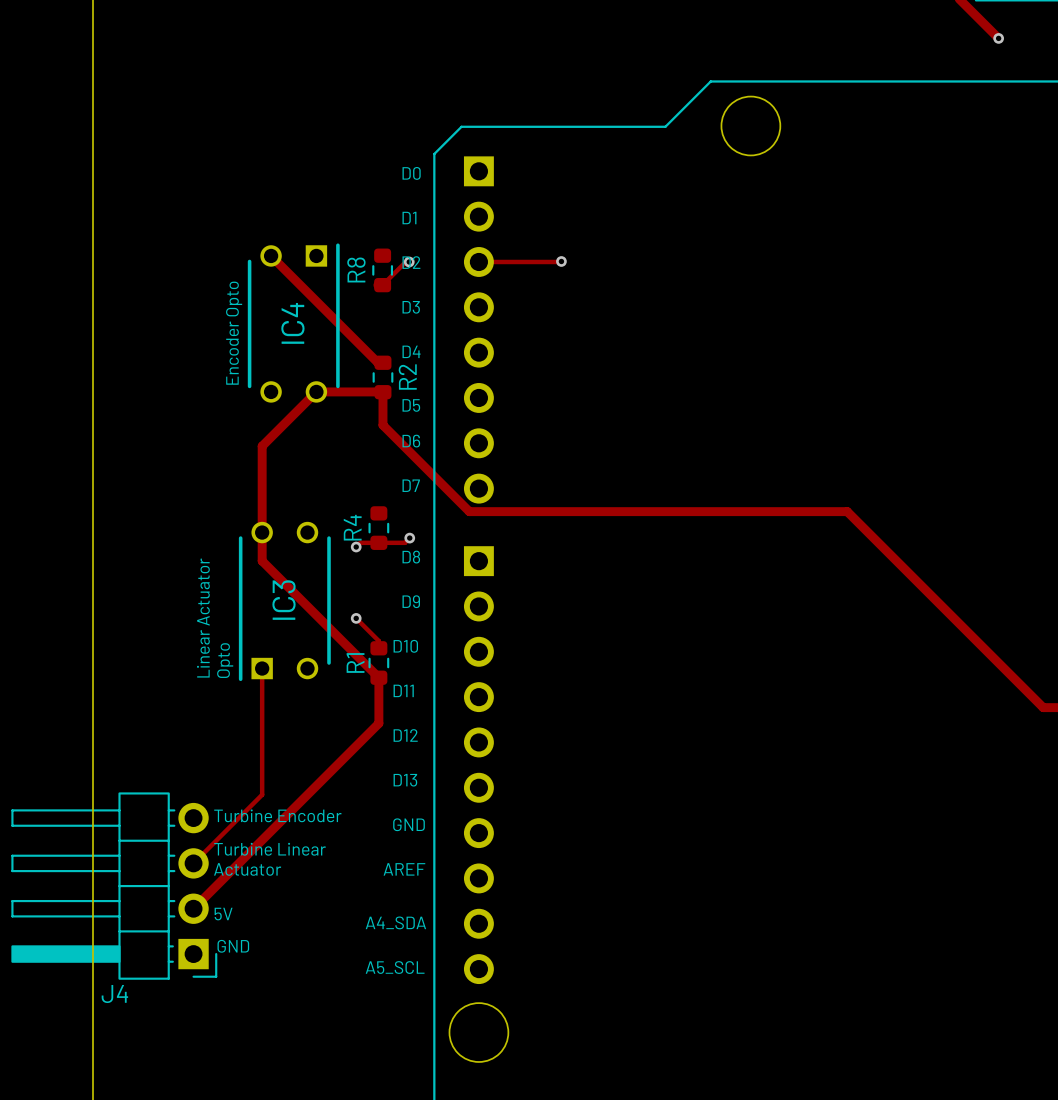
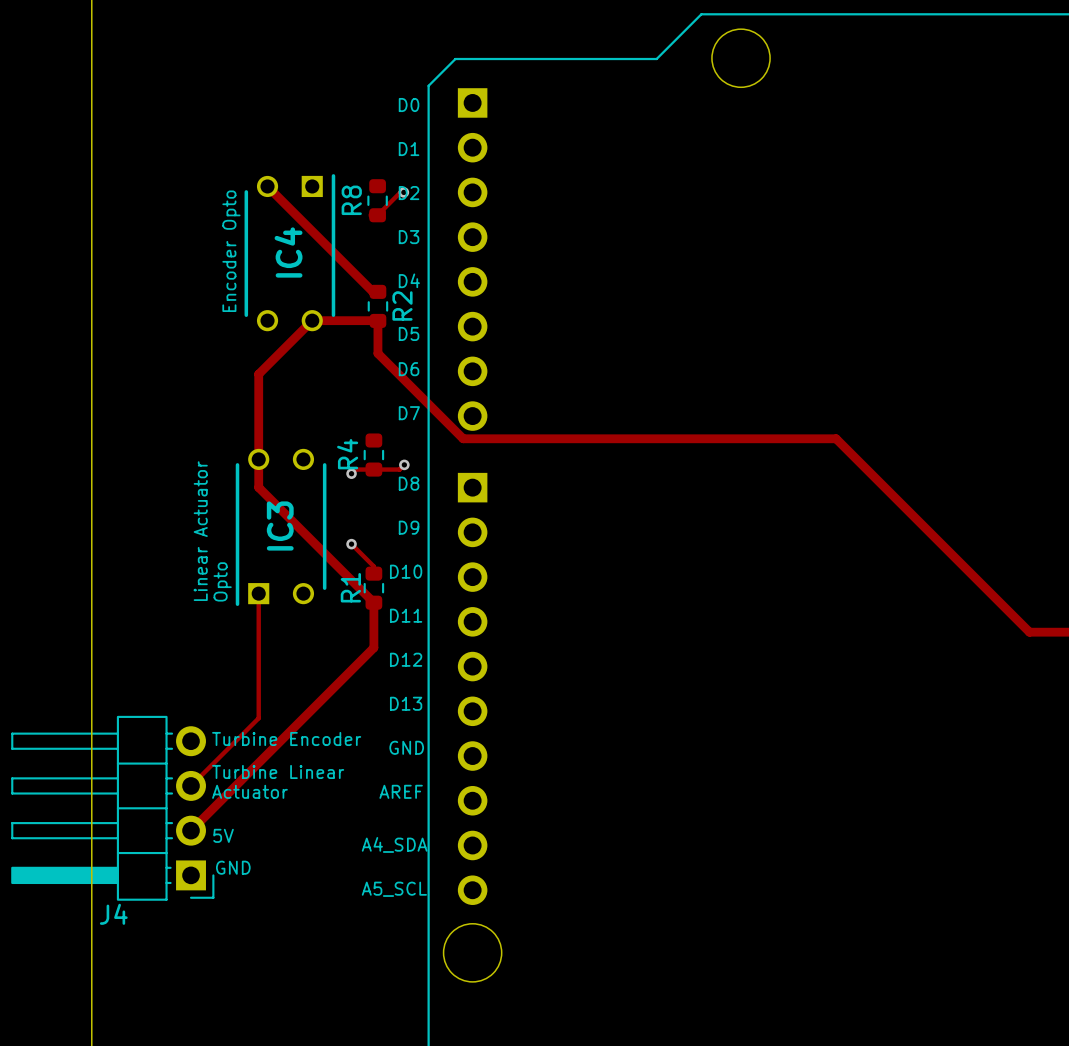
track: (561, 261) (478, 261) -> none
via: (561, 261) -> none

